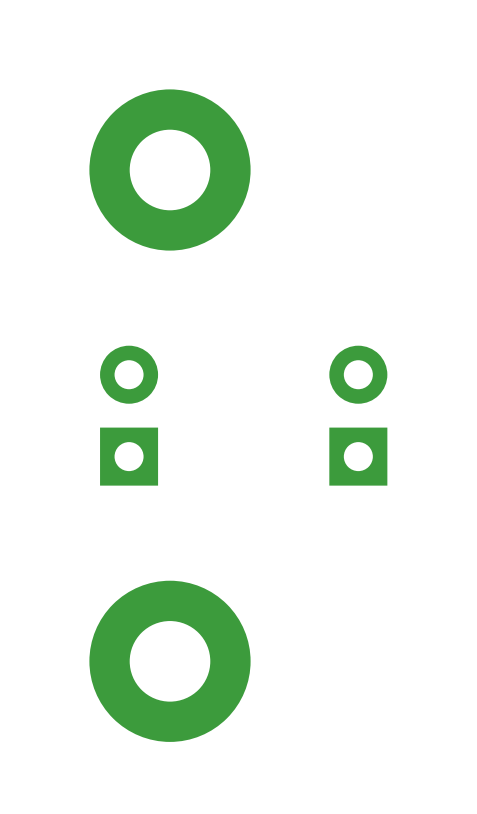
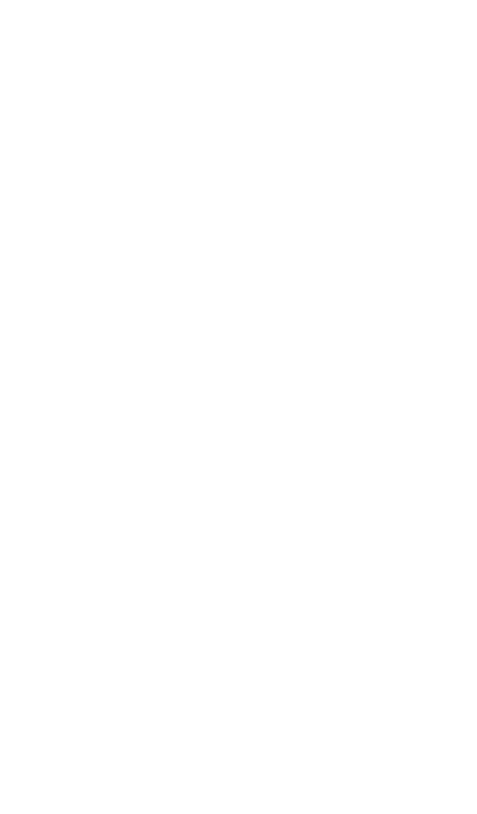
part: (170, 170) -> none
part: (129, 415) -> none
part: (358, 415) -> none
part: (170, 661) -> none

